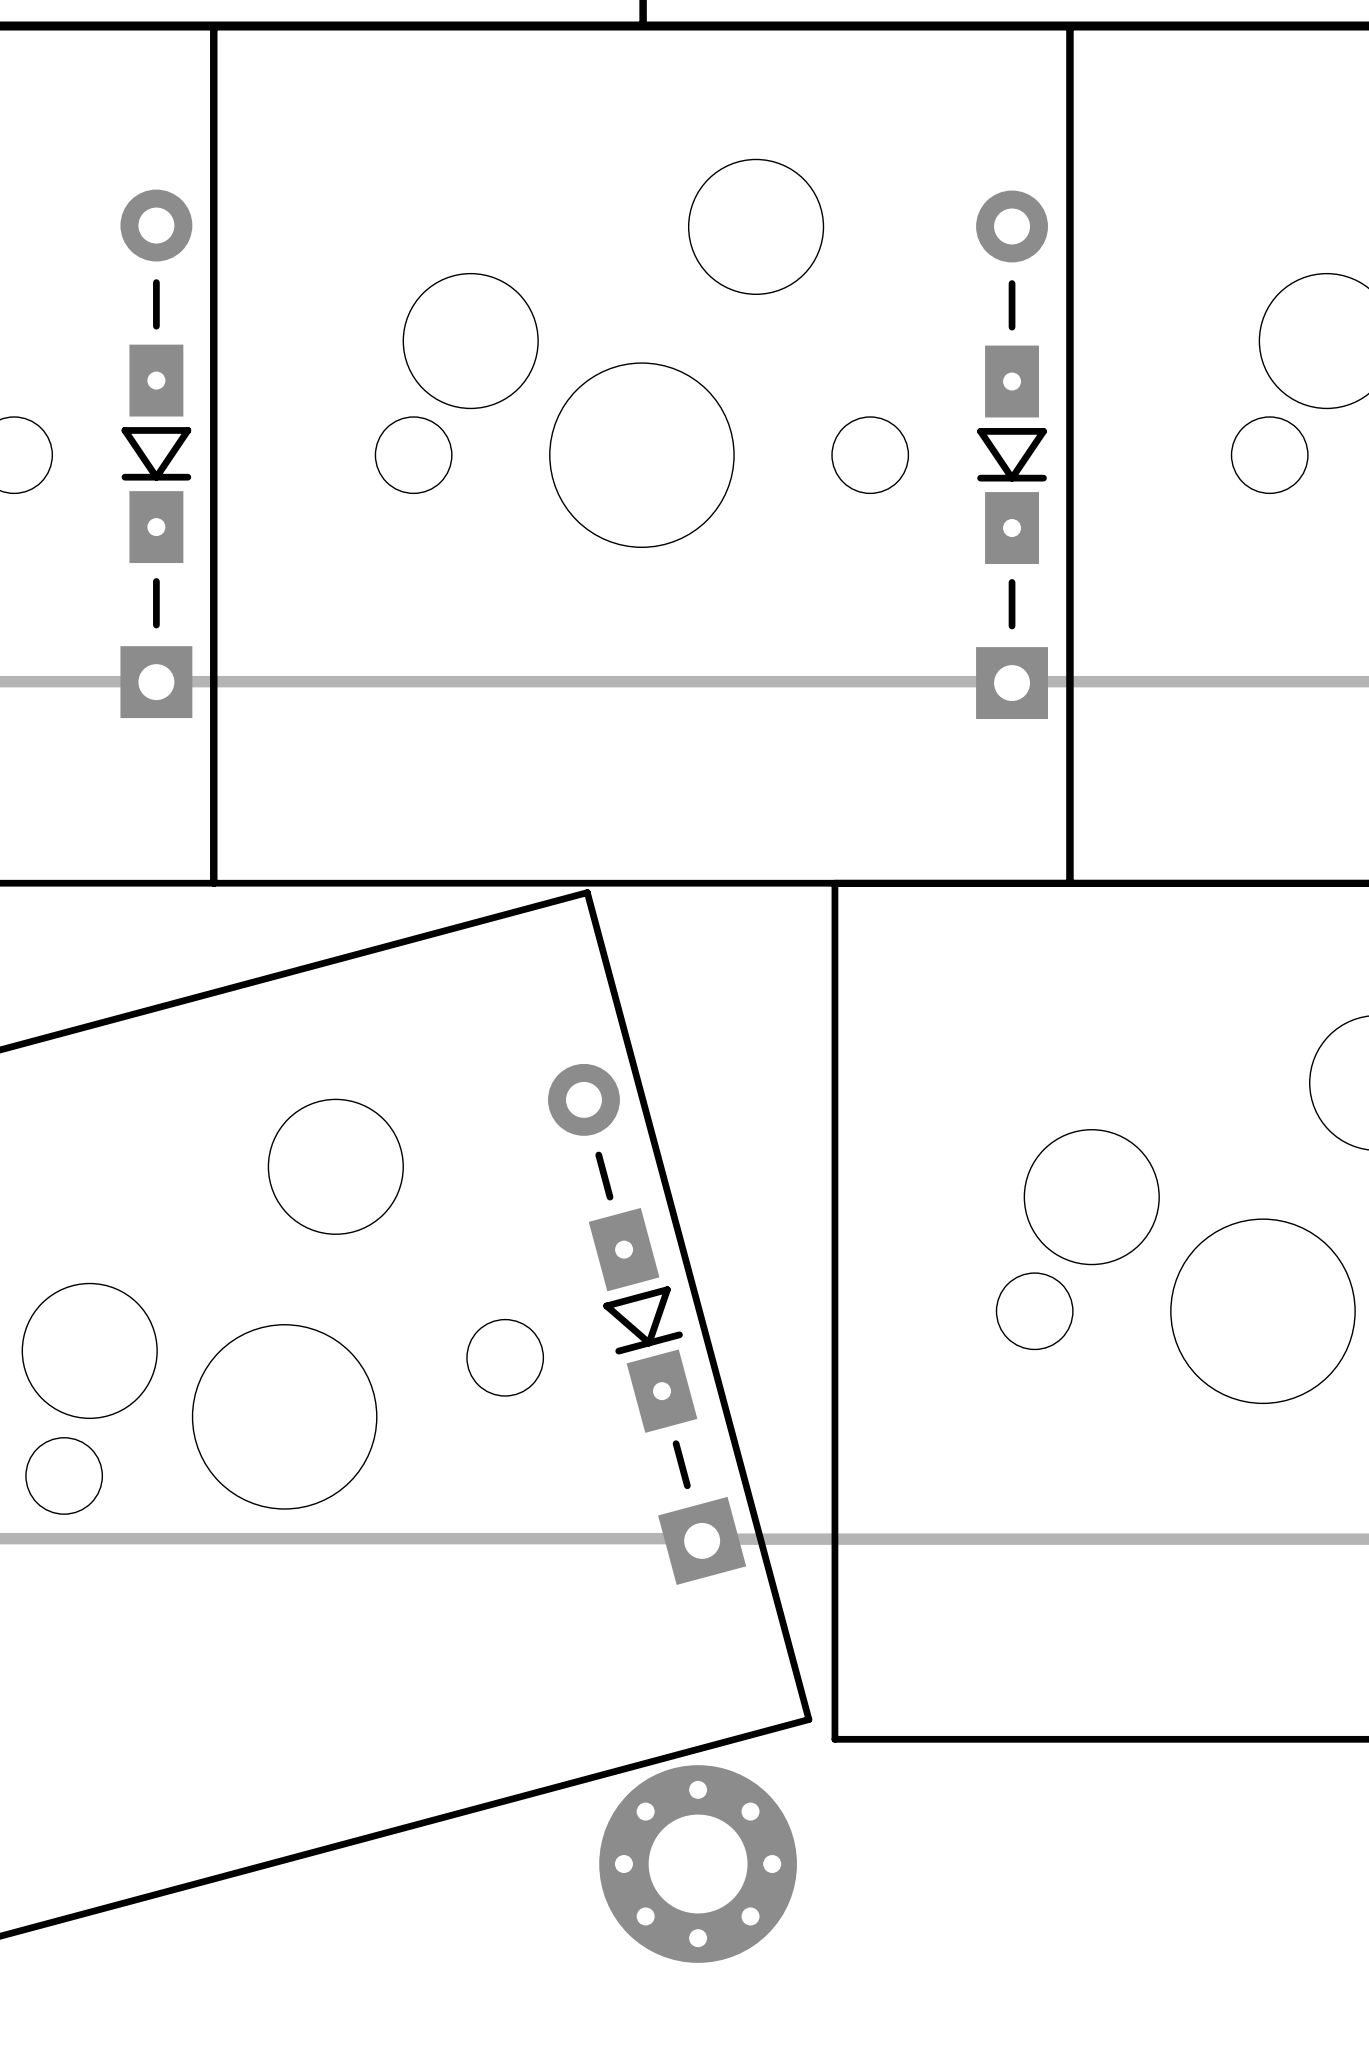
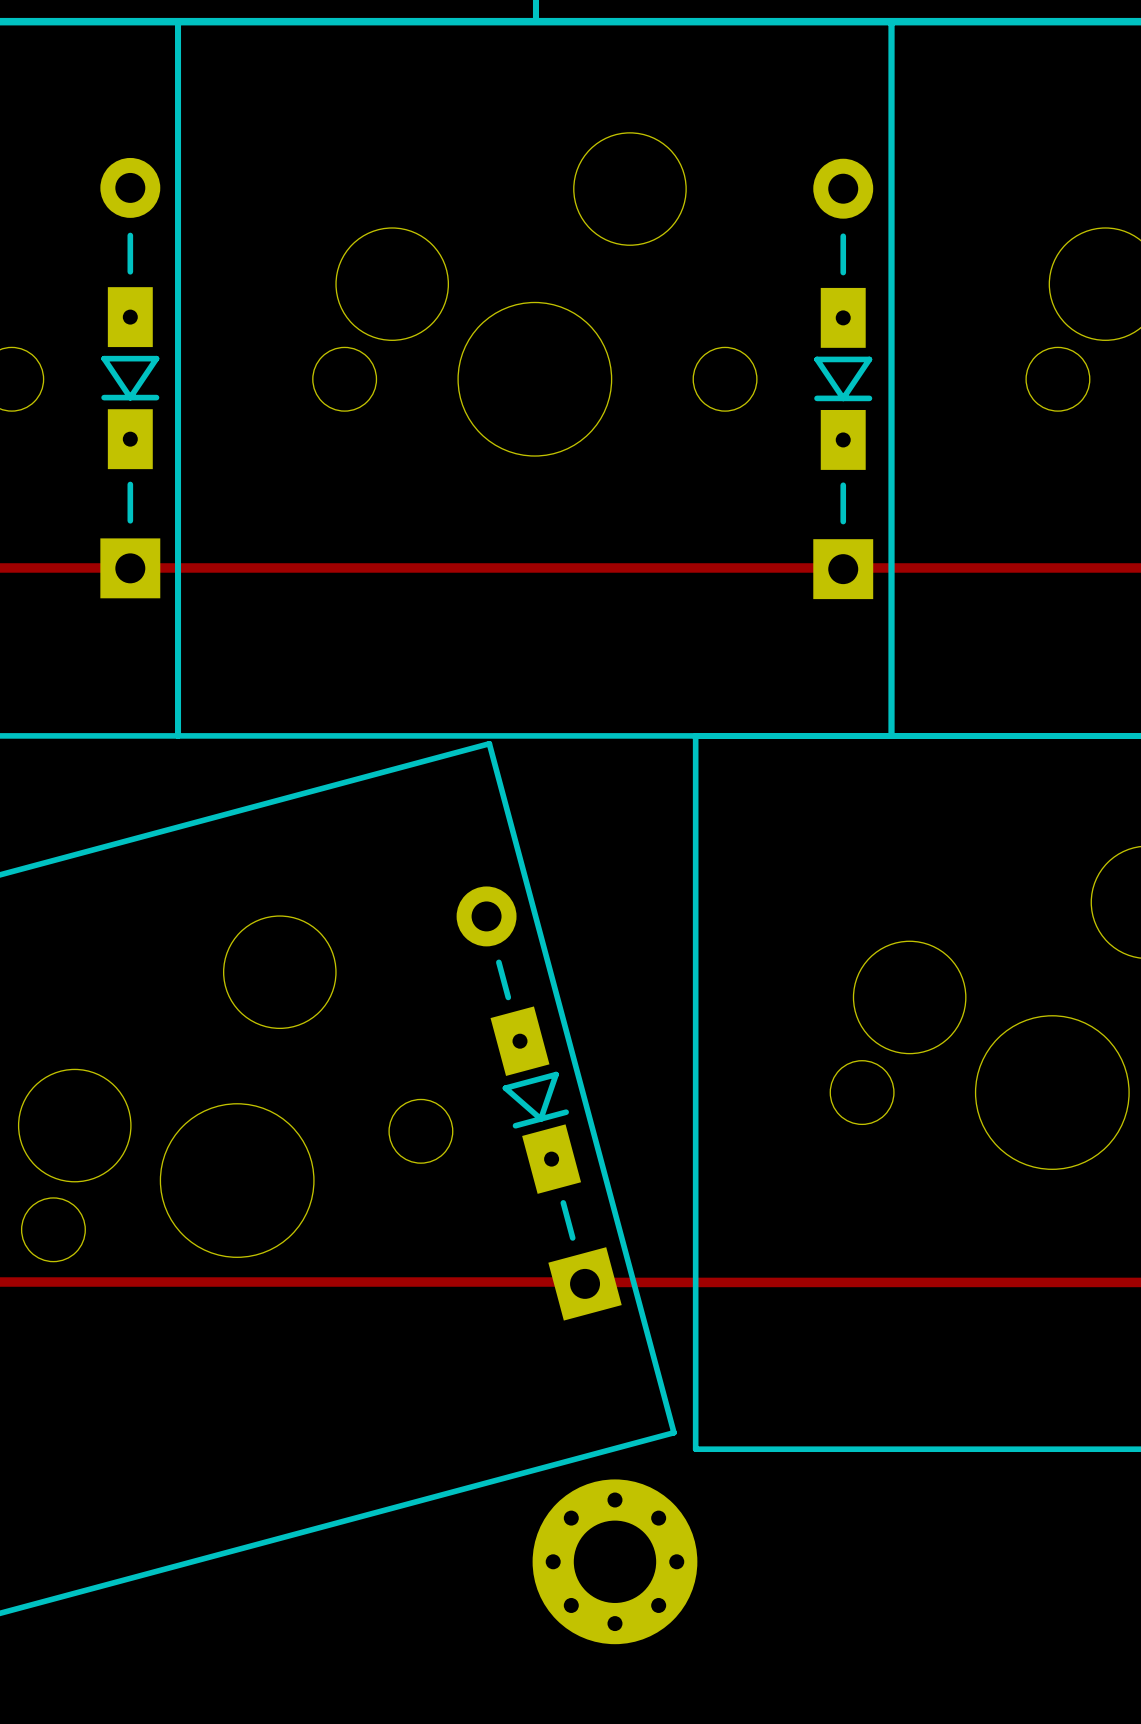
part position: (698, 1864) -> (614, 1561)

